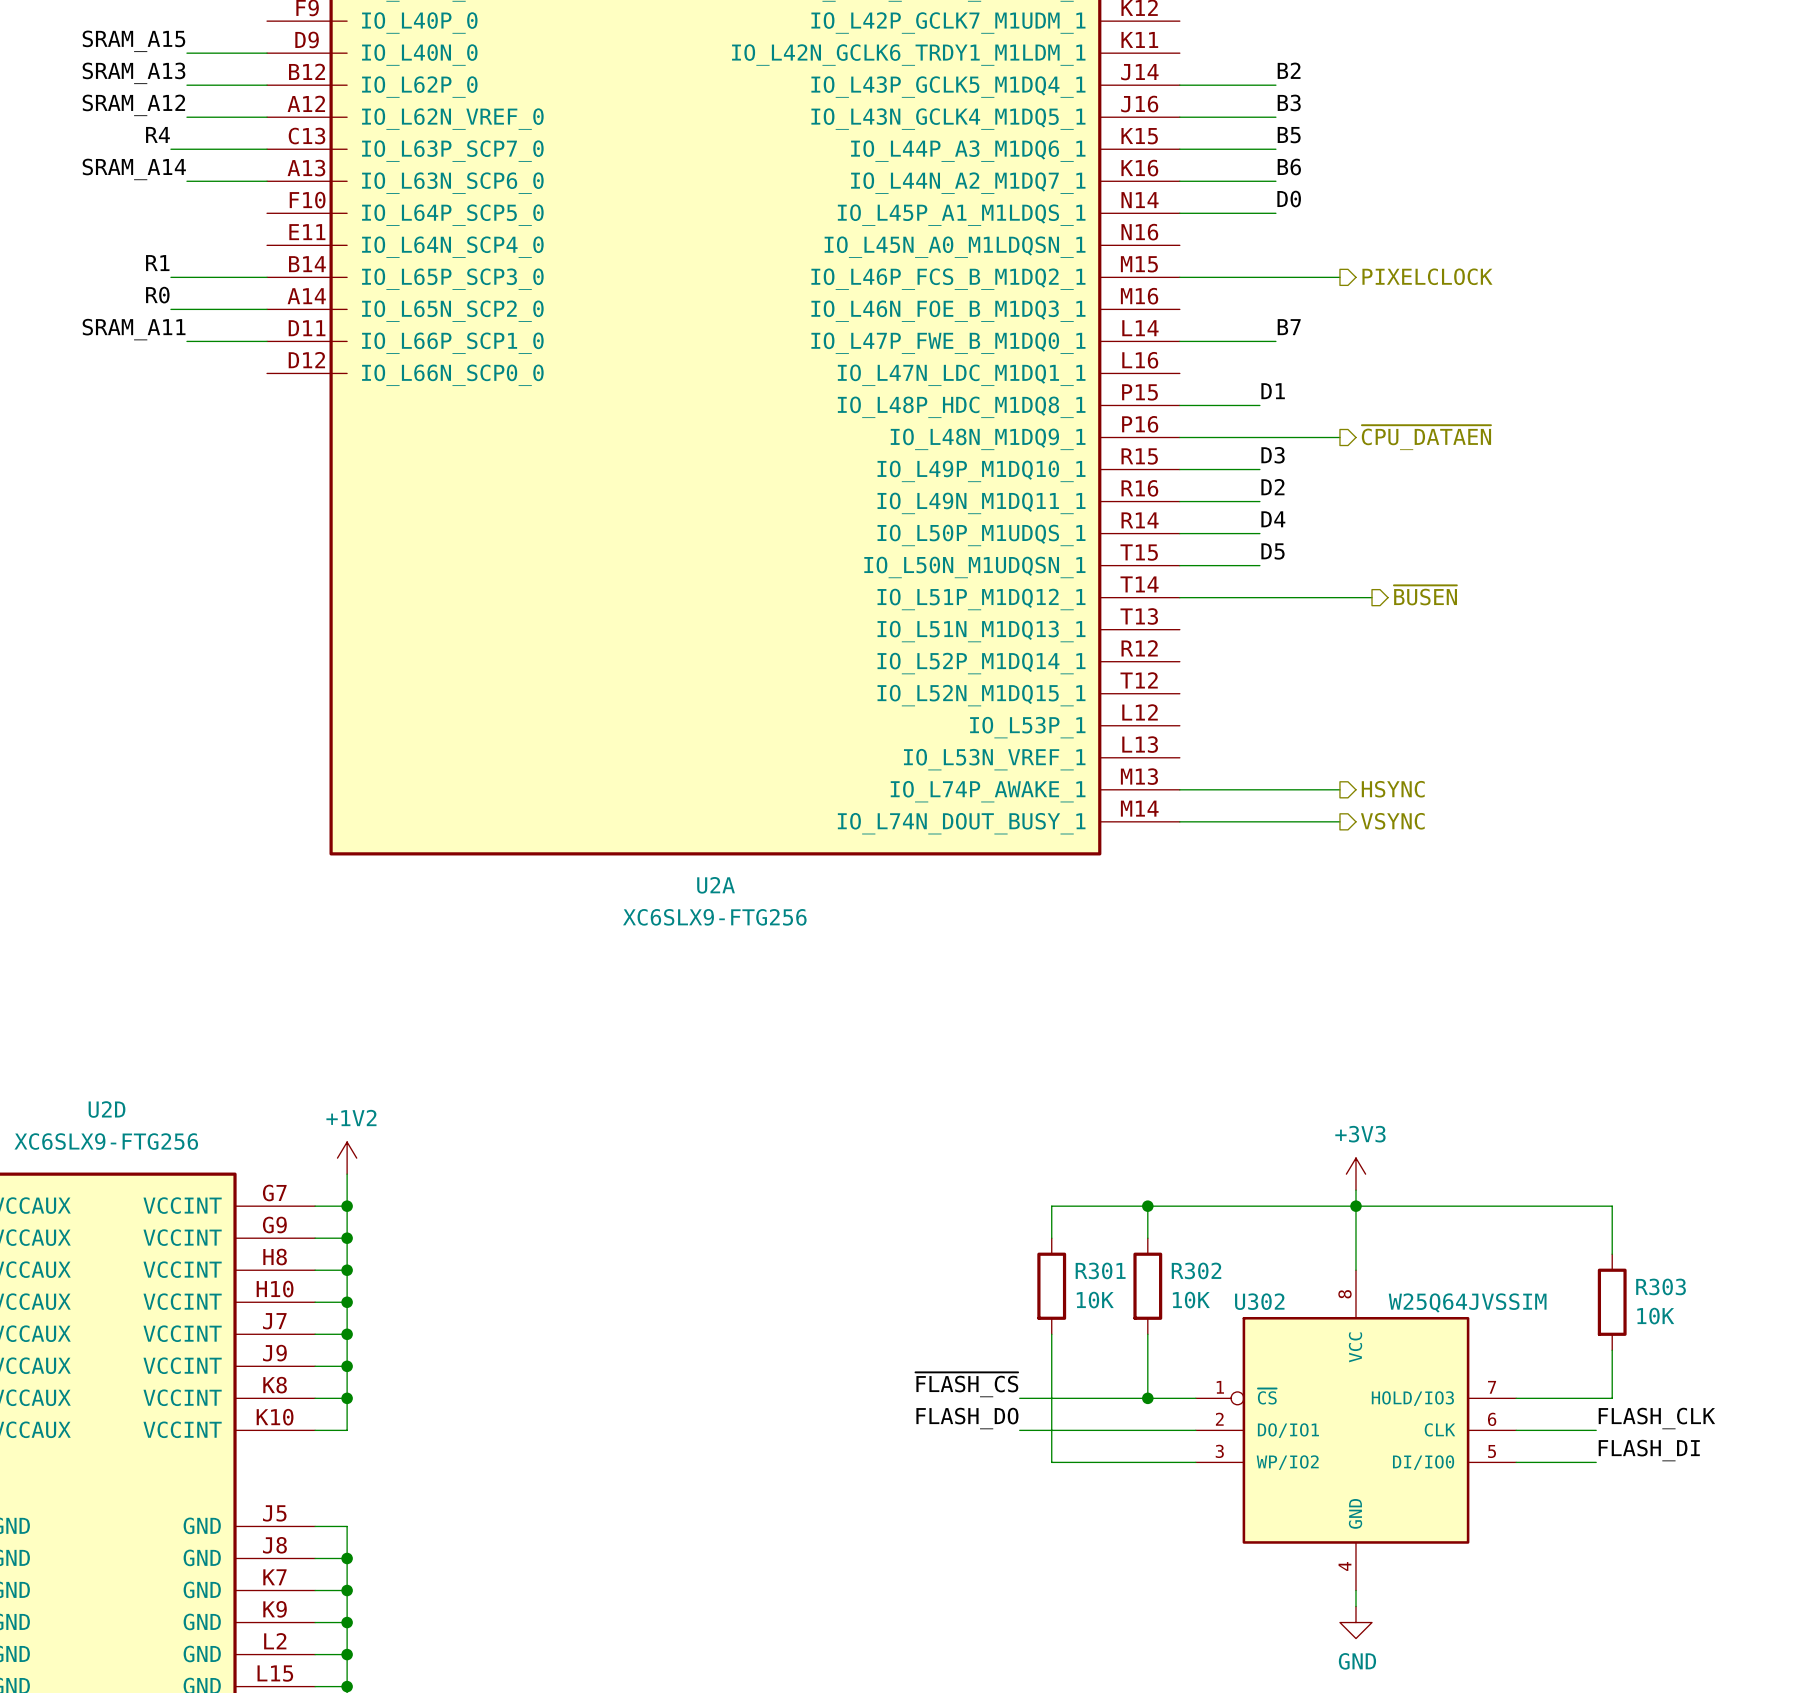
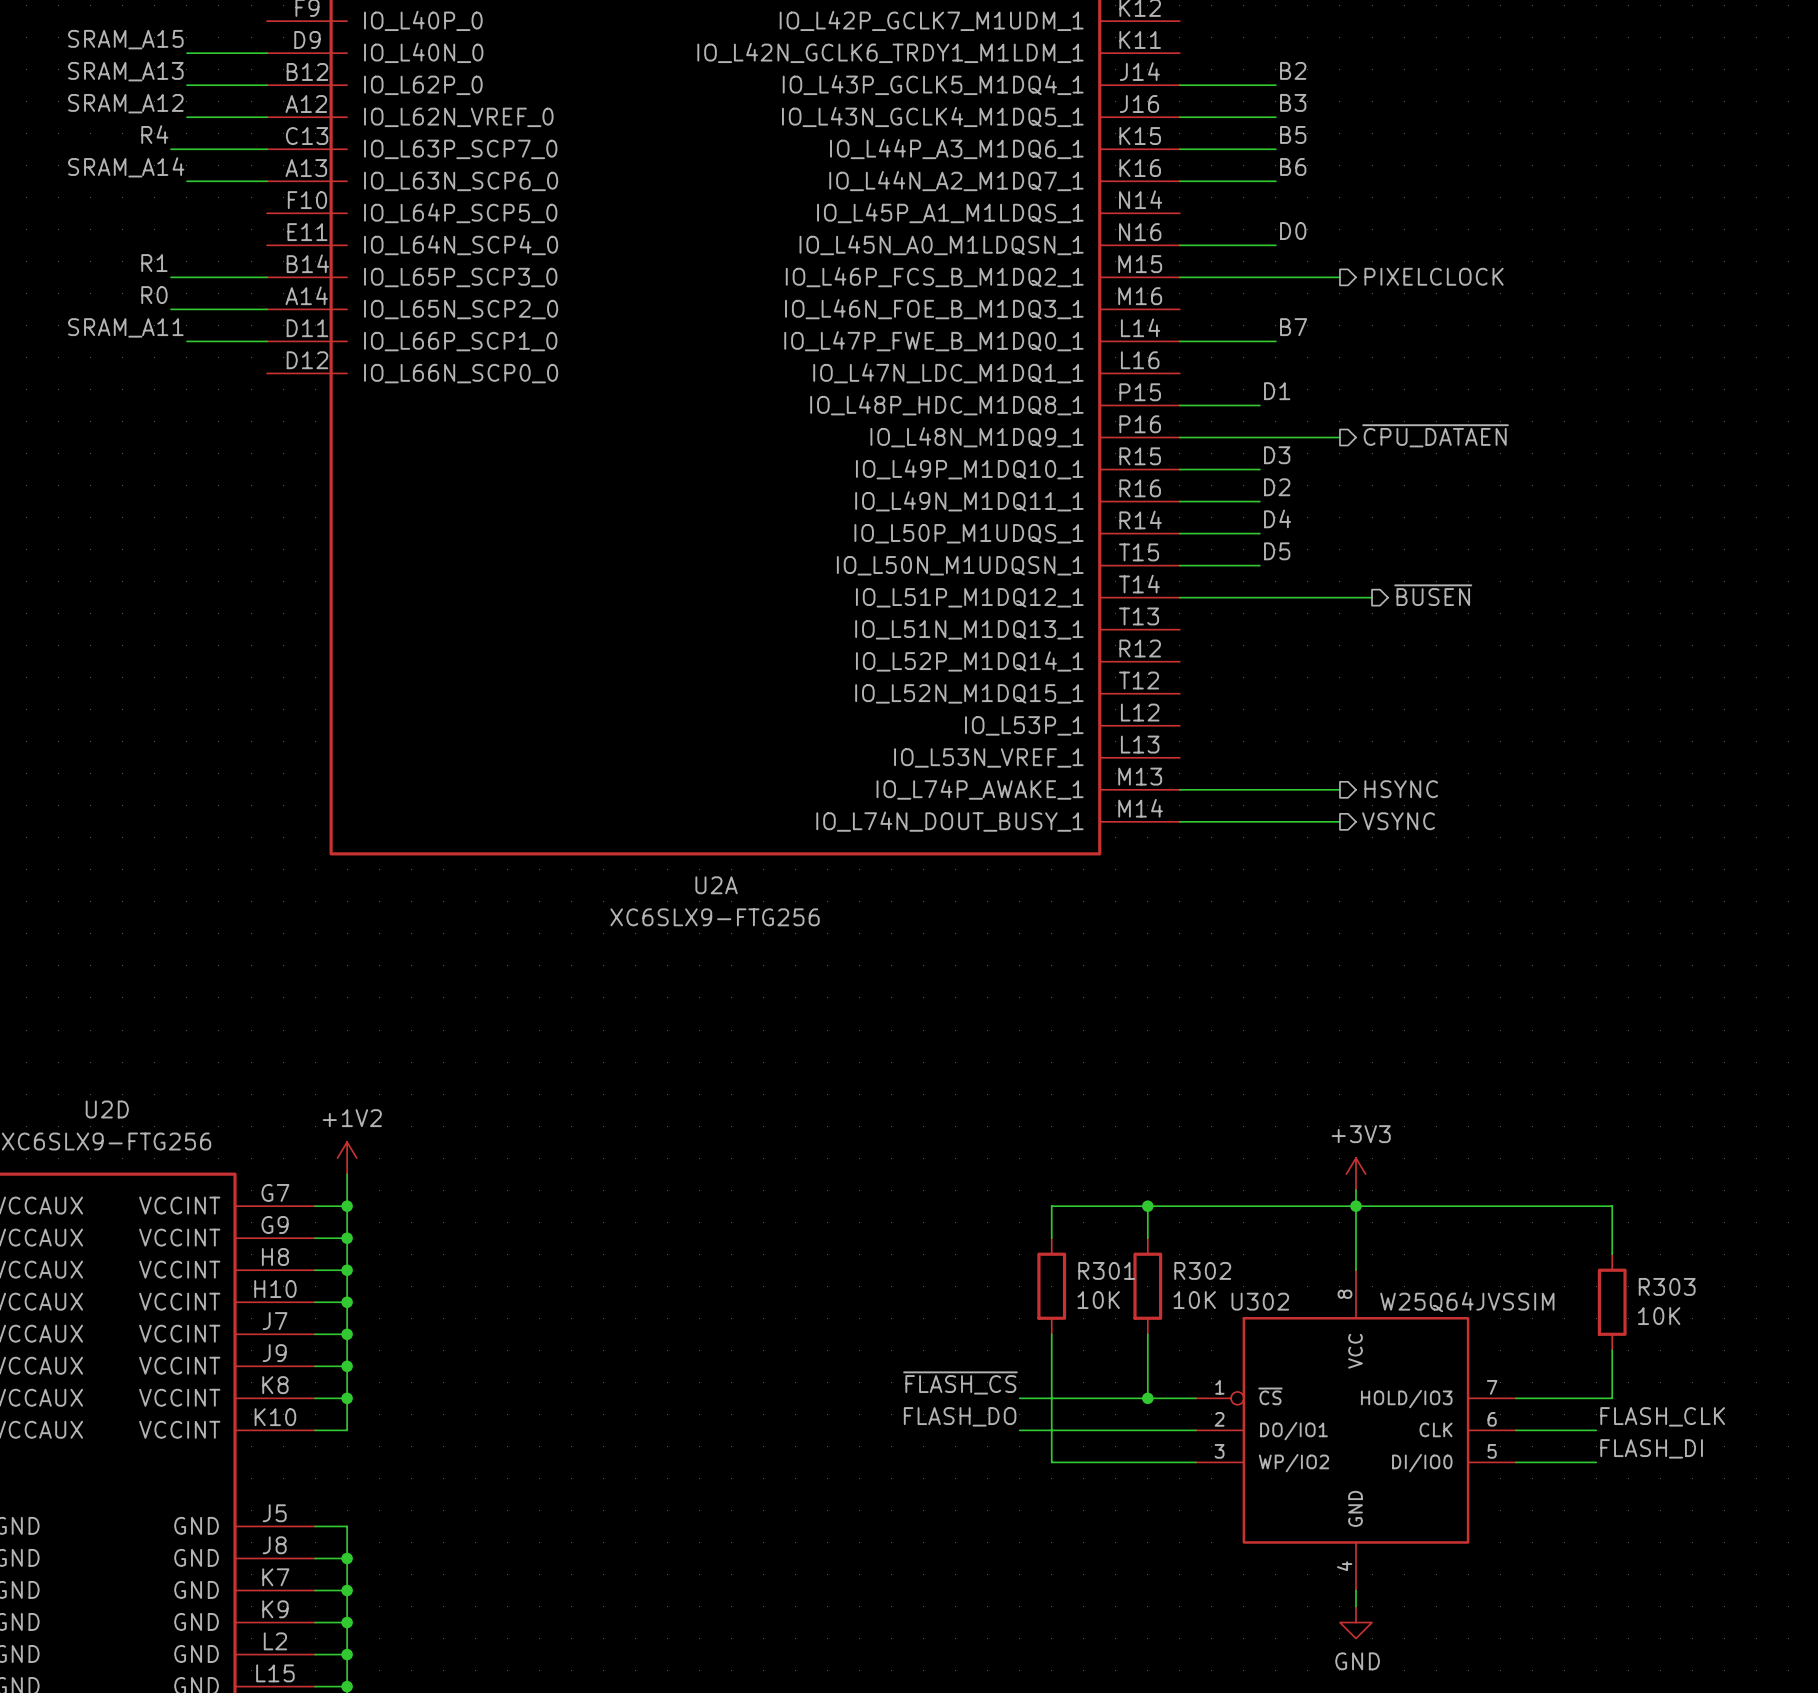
label position: D0 (1289, 199) -> D0 (1293, 231)
wire: (1179, 213) (1275, 213) -> (1179, 245) (1275, 245)

